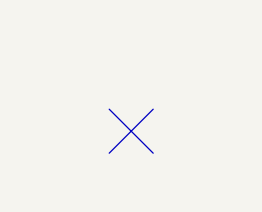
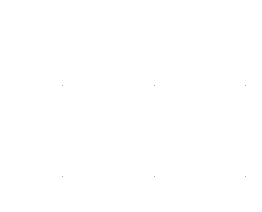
no-connect mark: (131, 131) -> none

